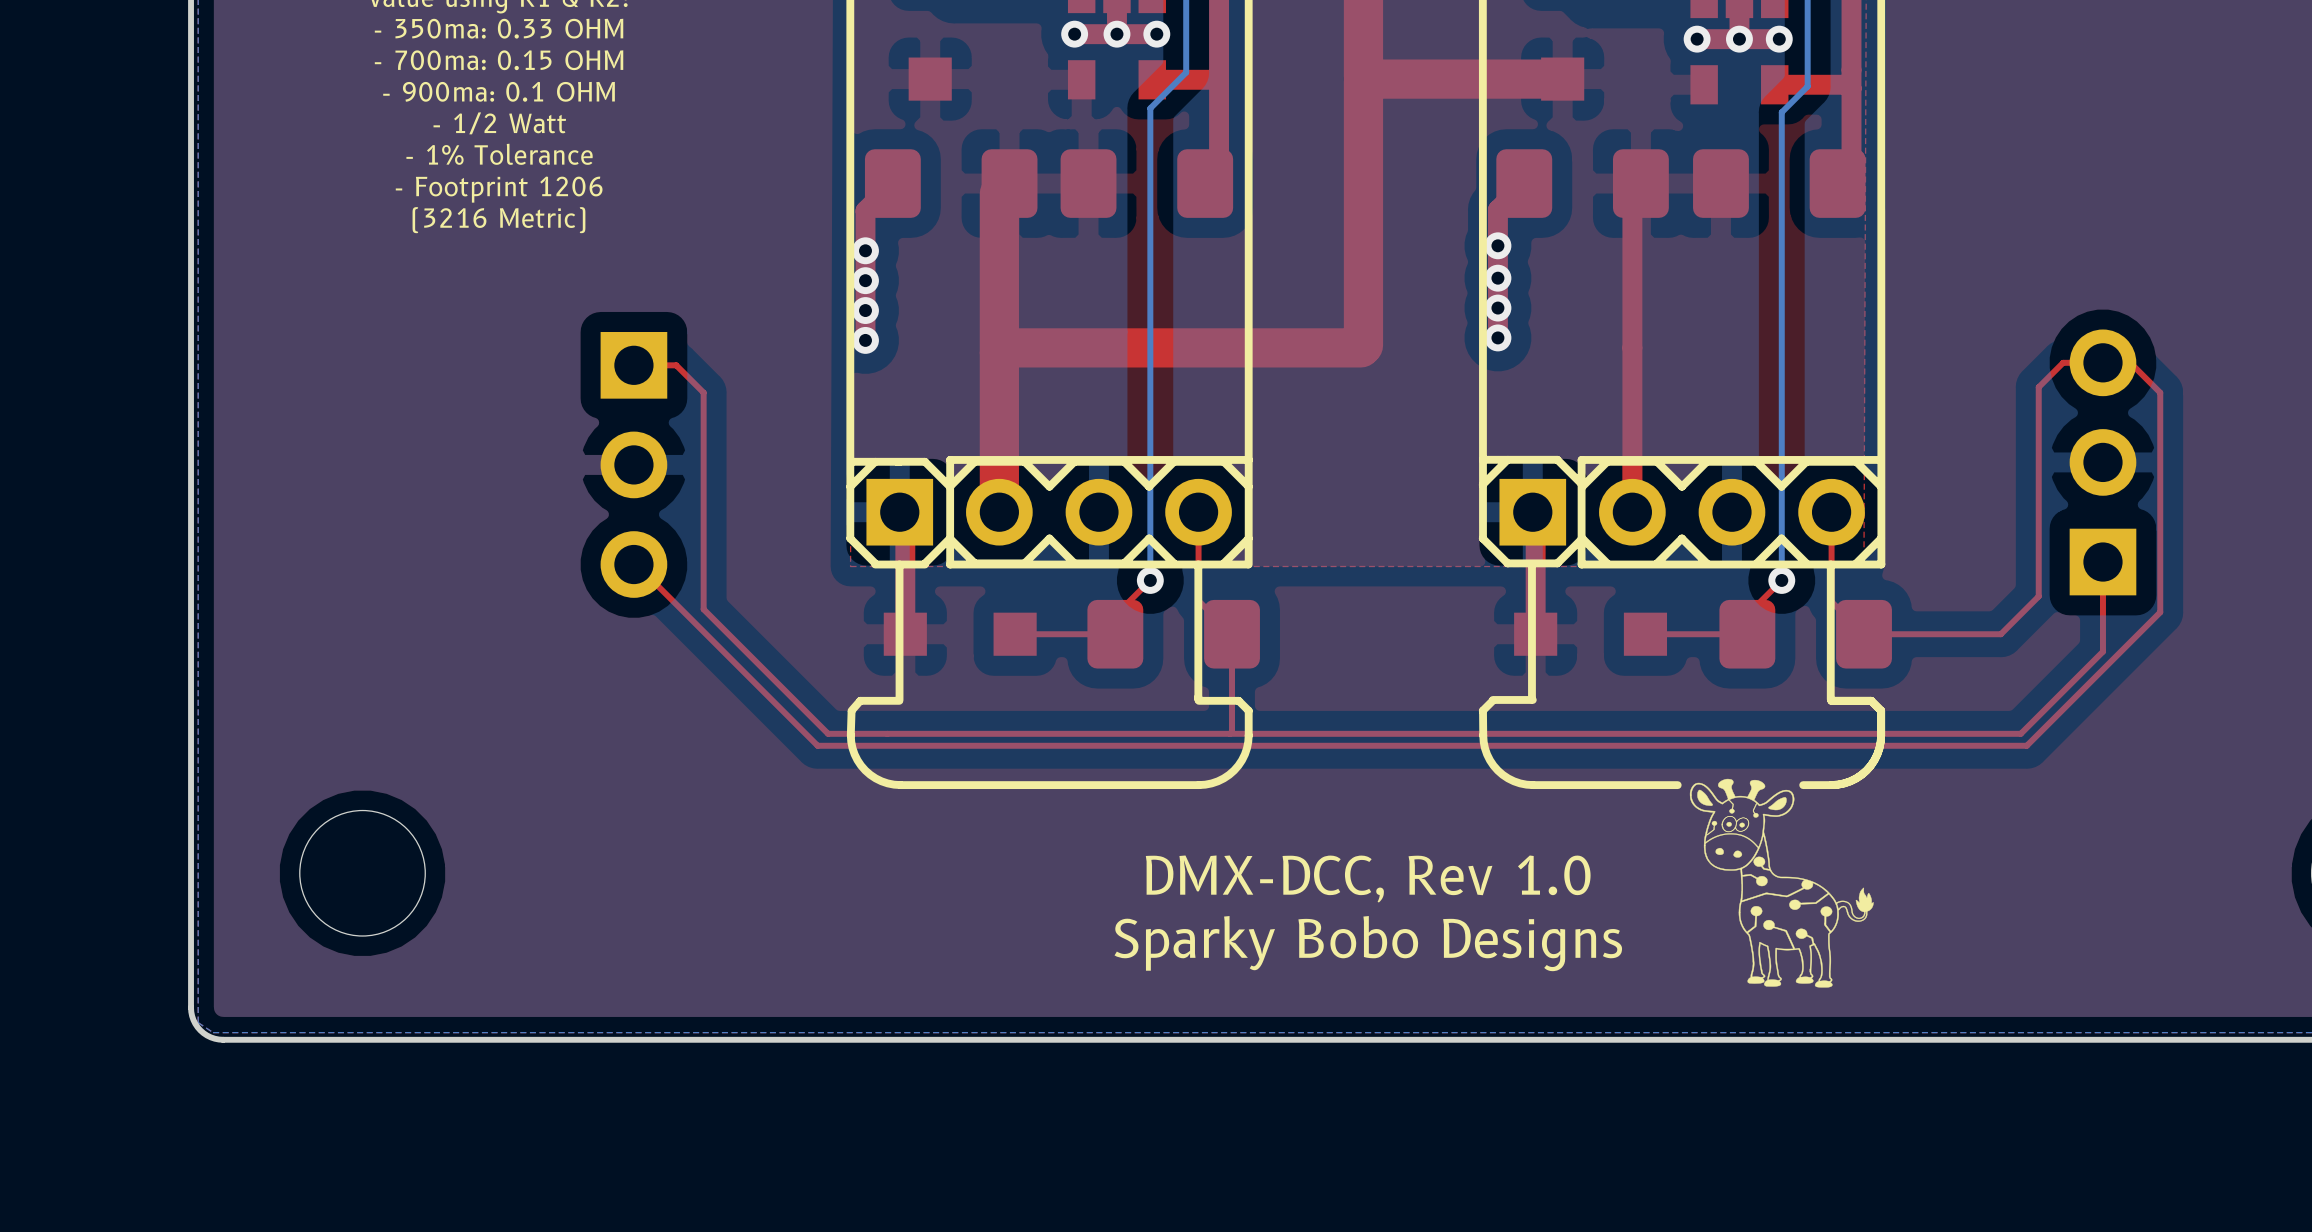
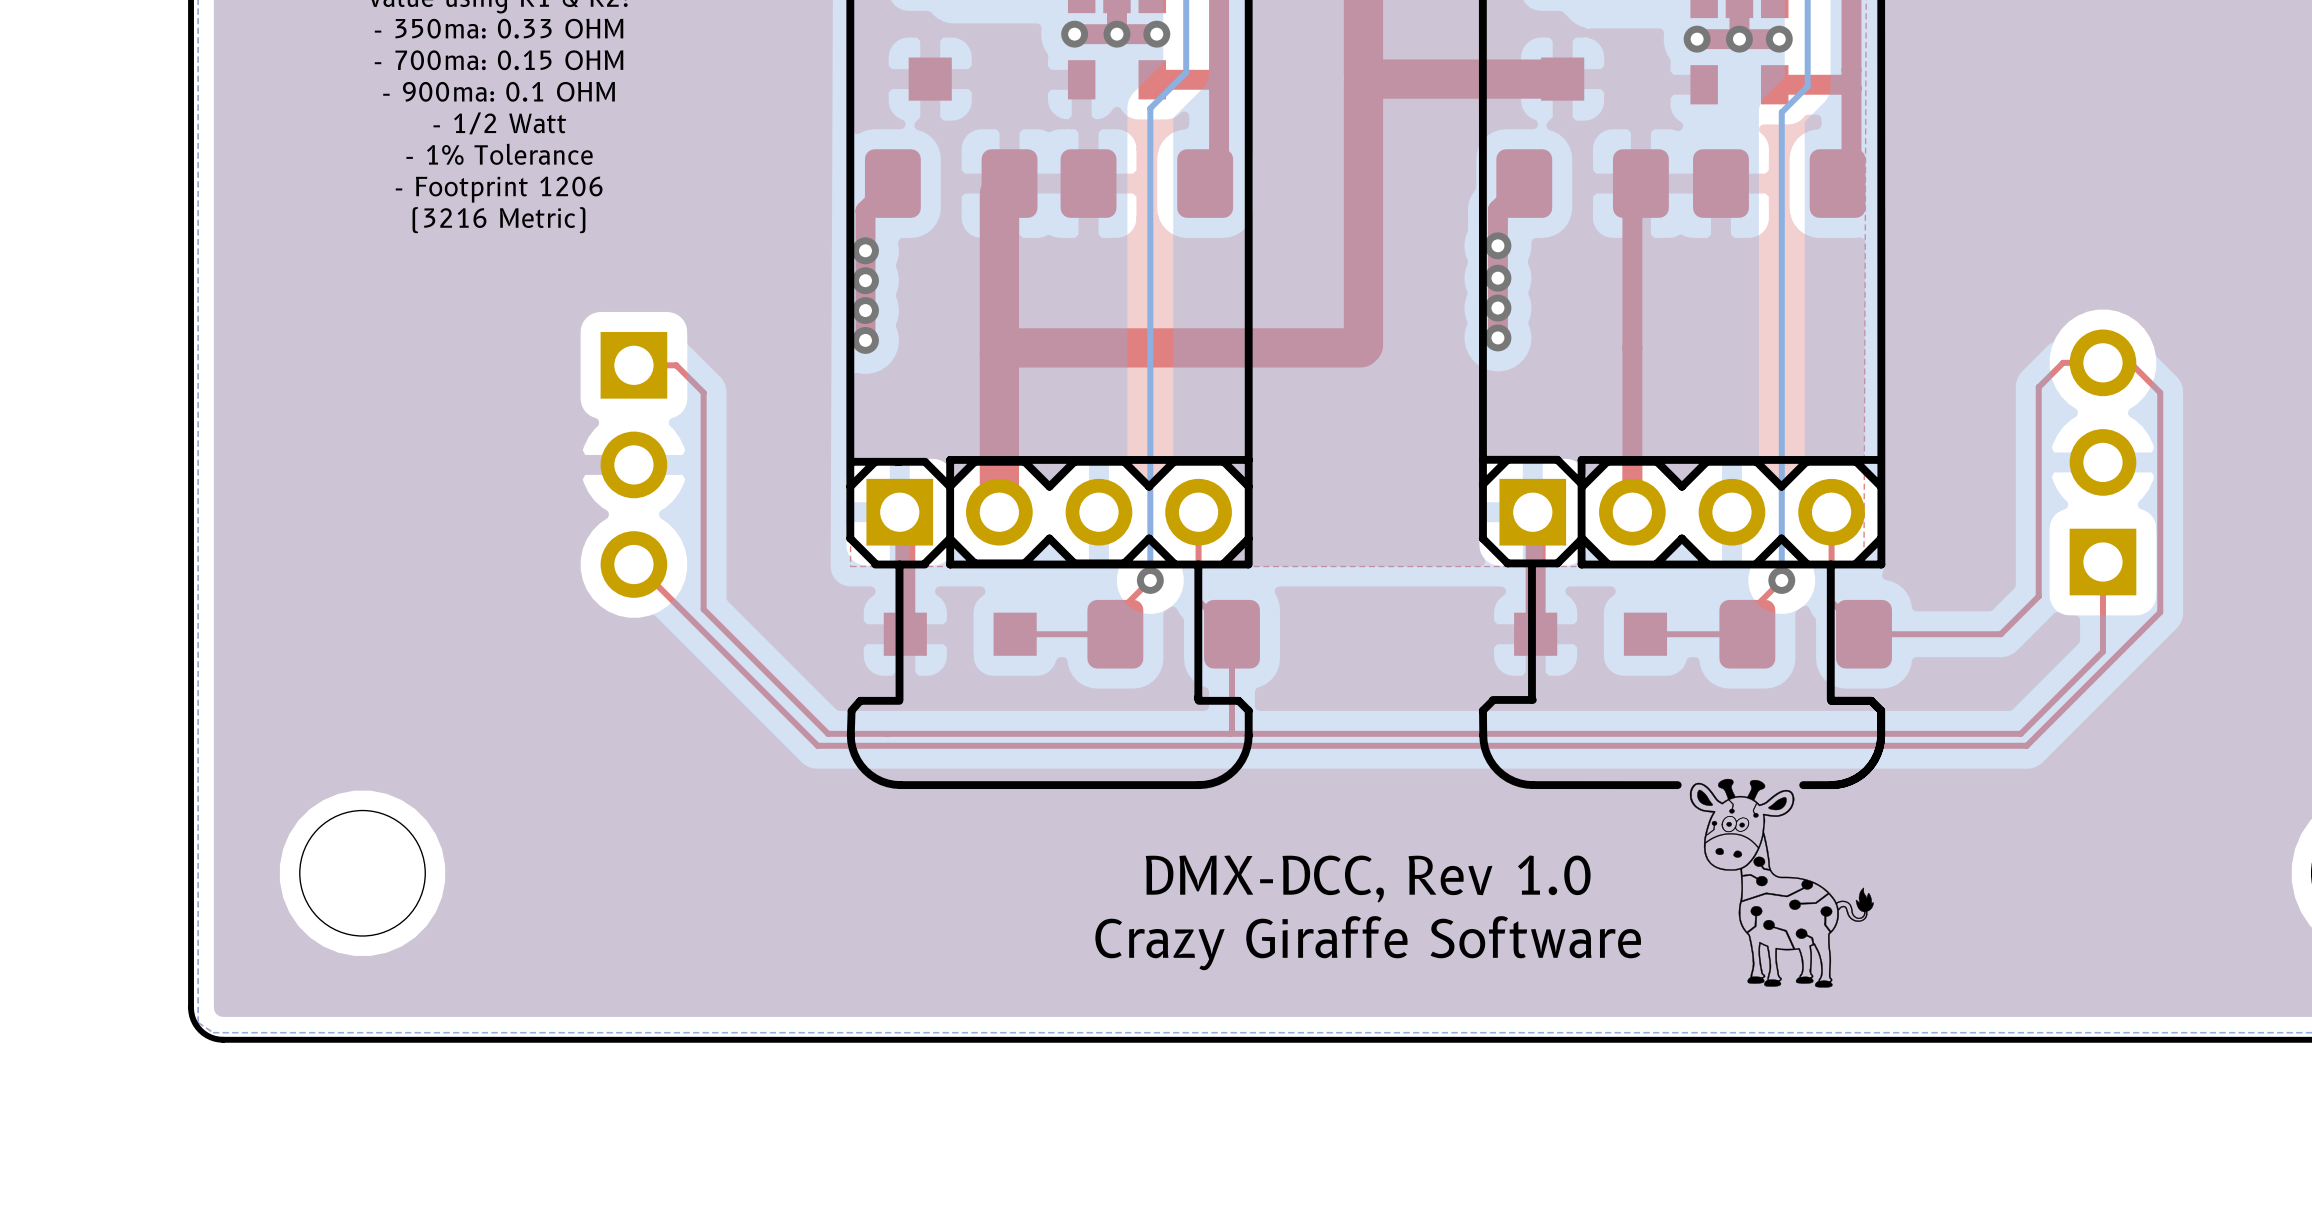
text: Sparky Bobo Designs (1368, 943) -> Crazy Giraffe Software (1368, 943)

